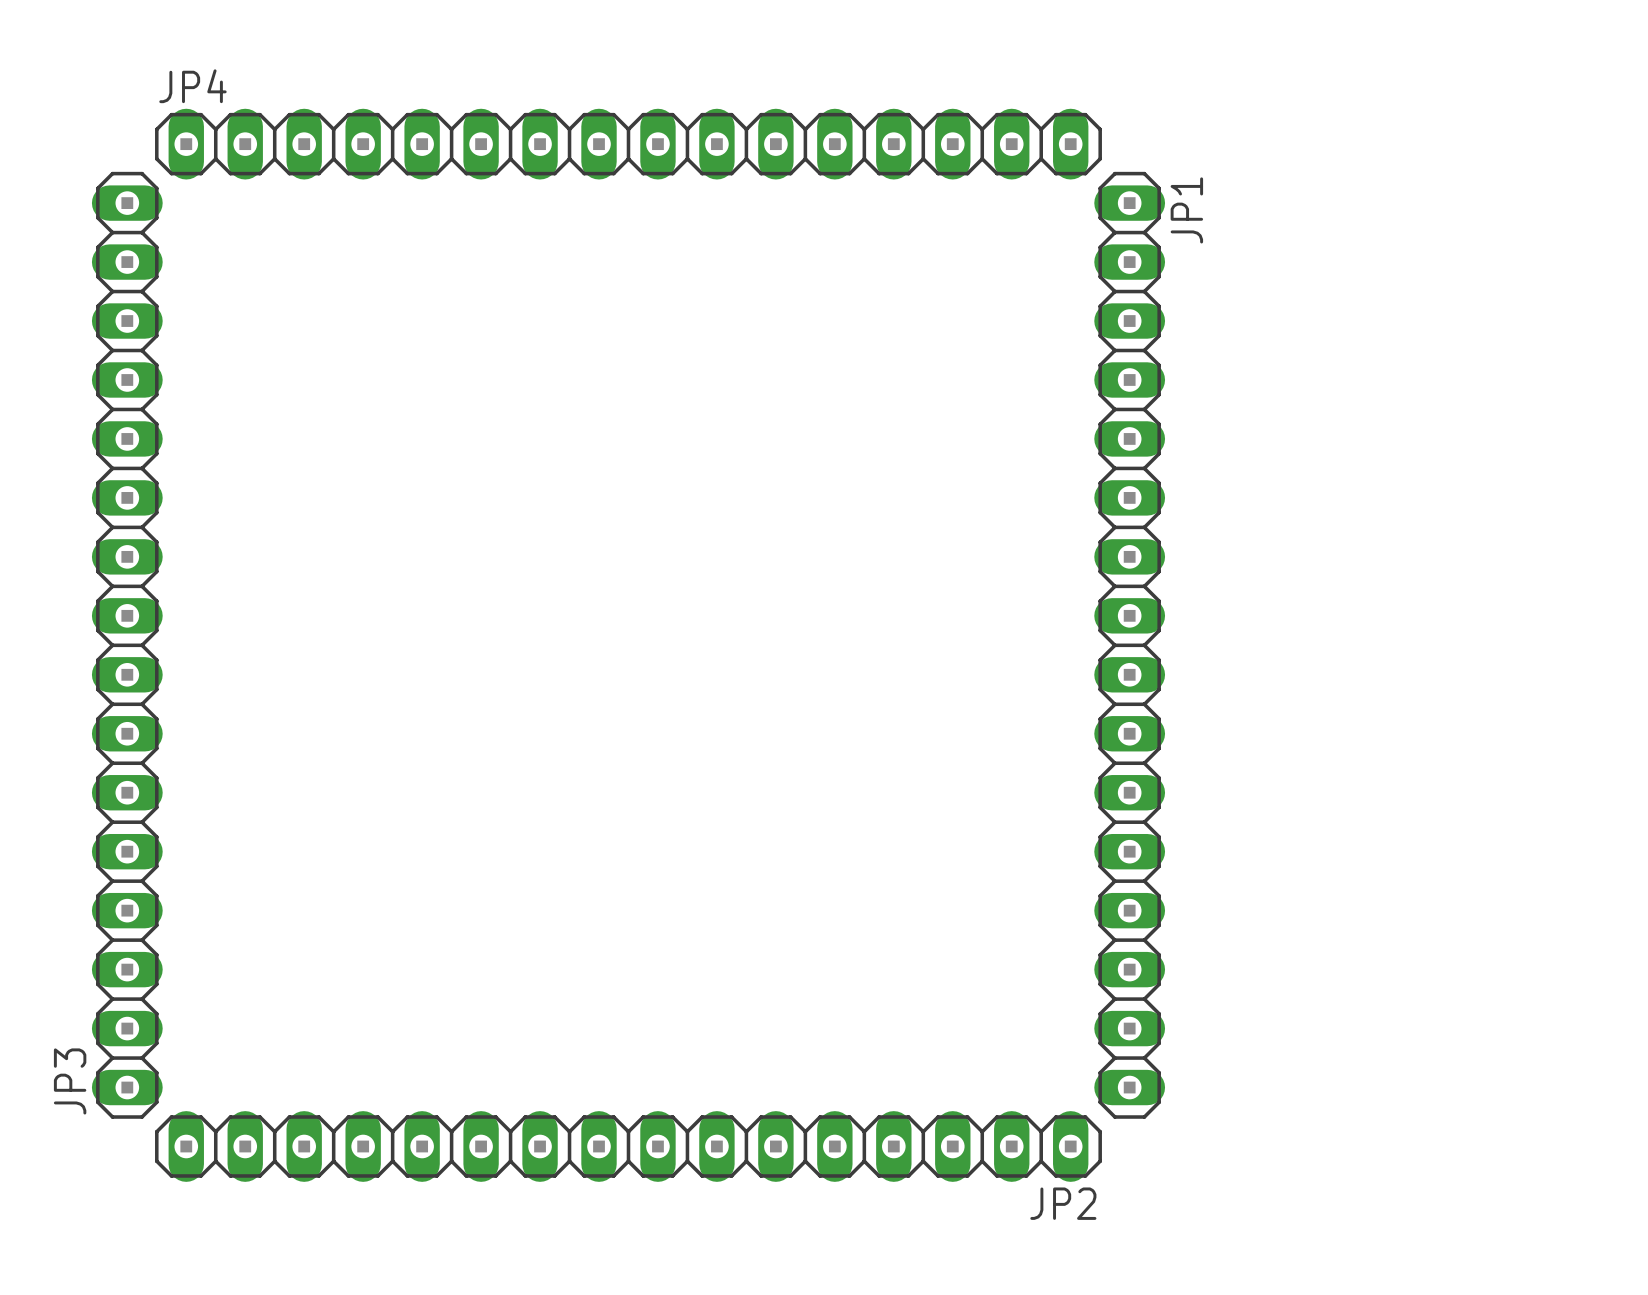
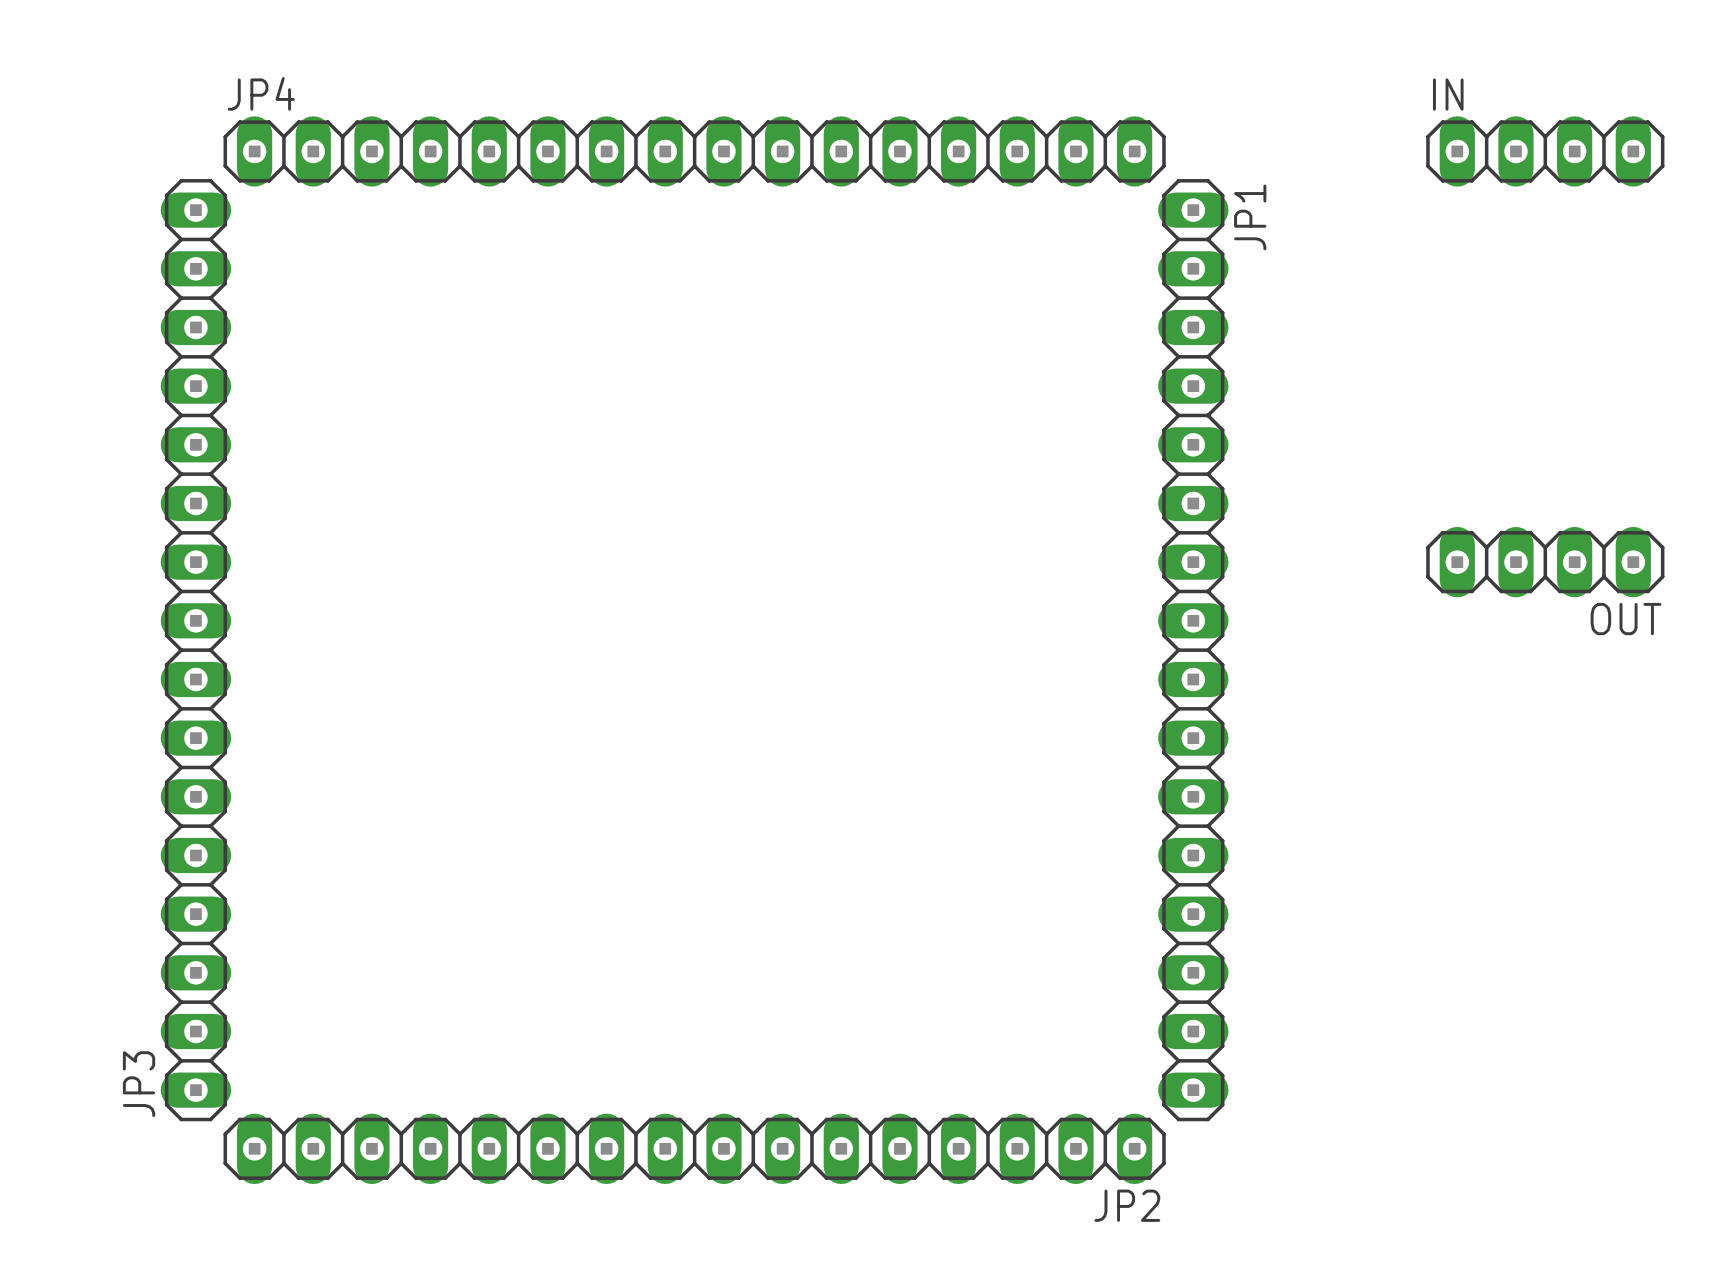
IN: none -> (1545, 151)
OUT: none -> (1545, 562)

